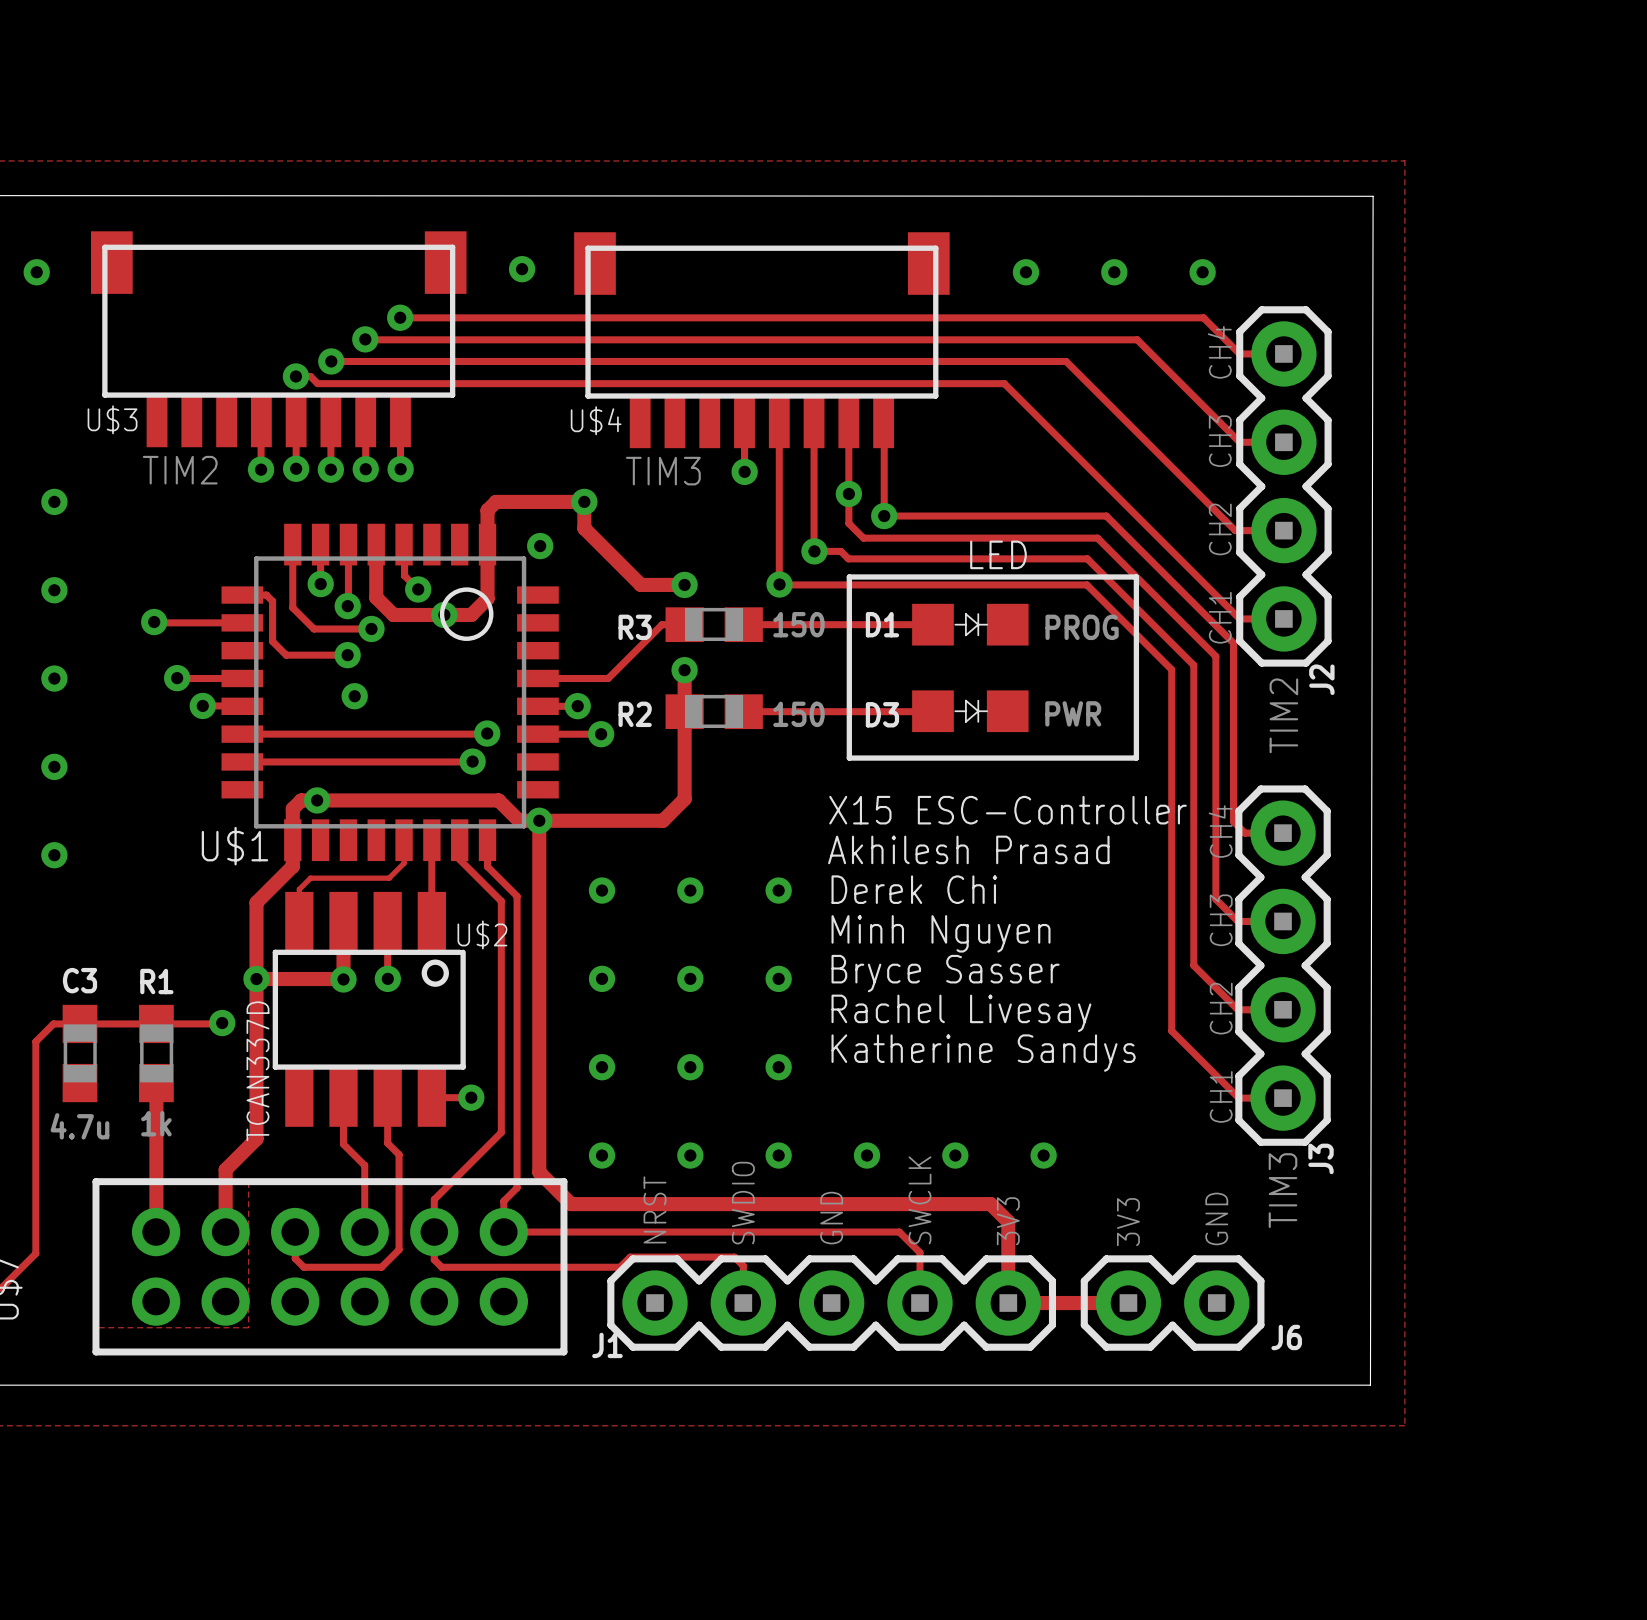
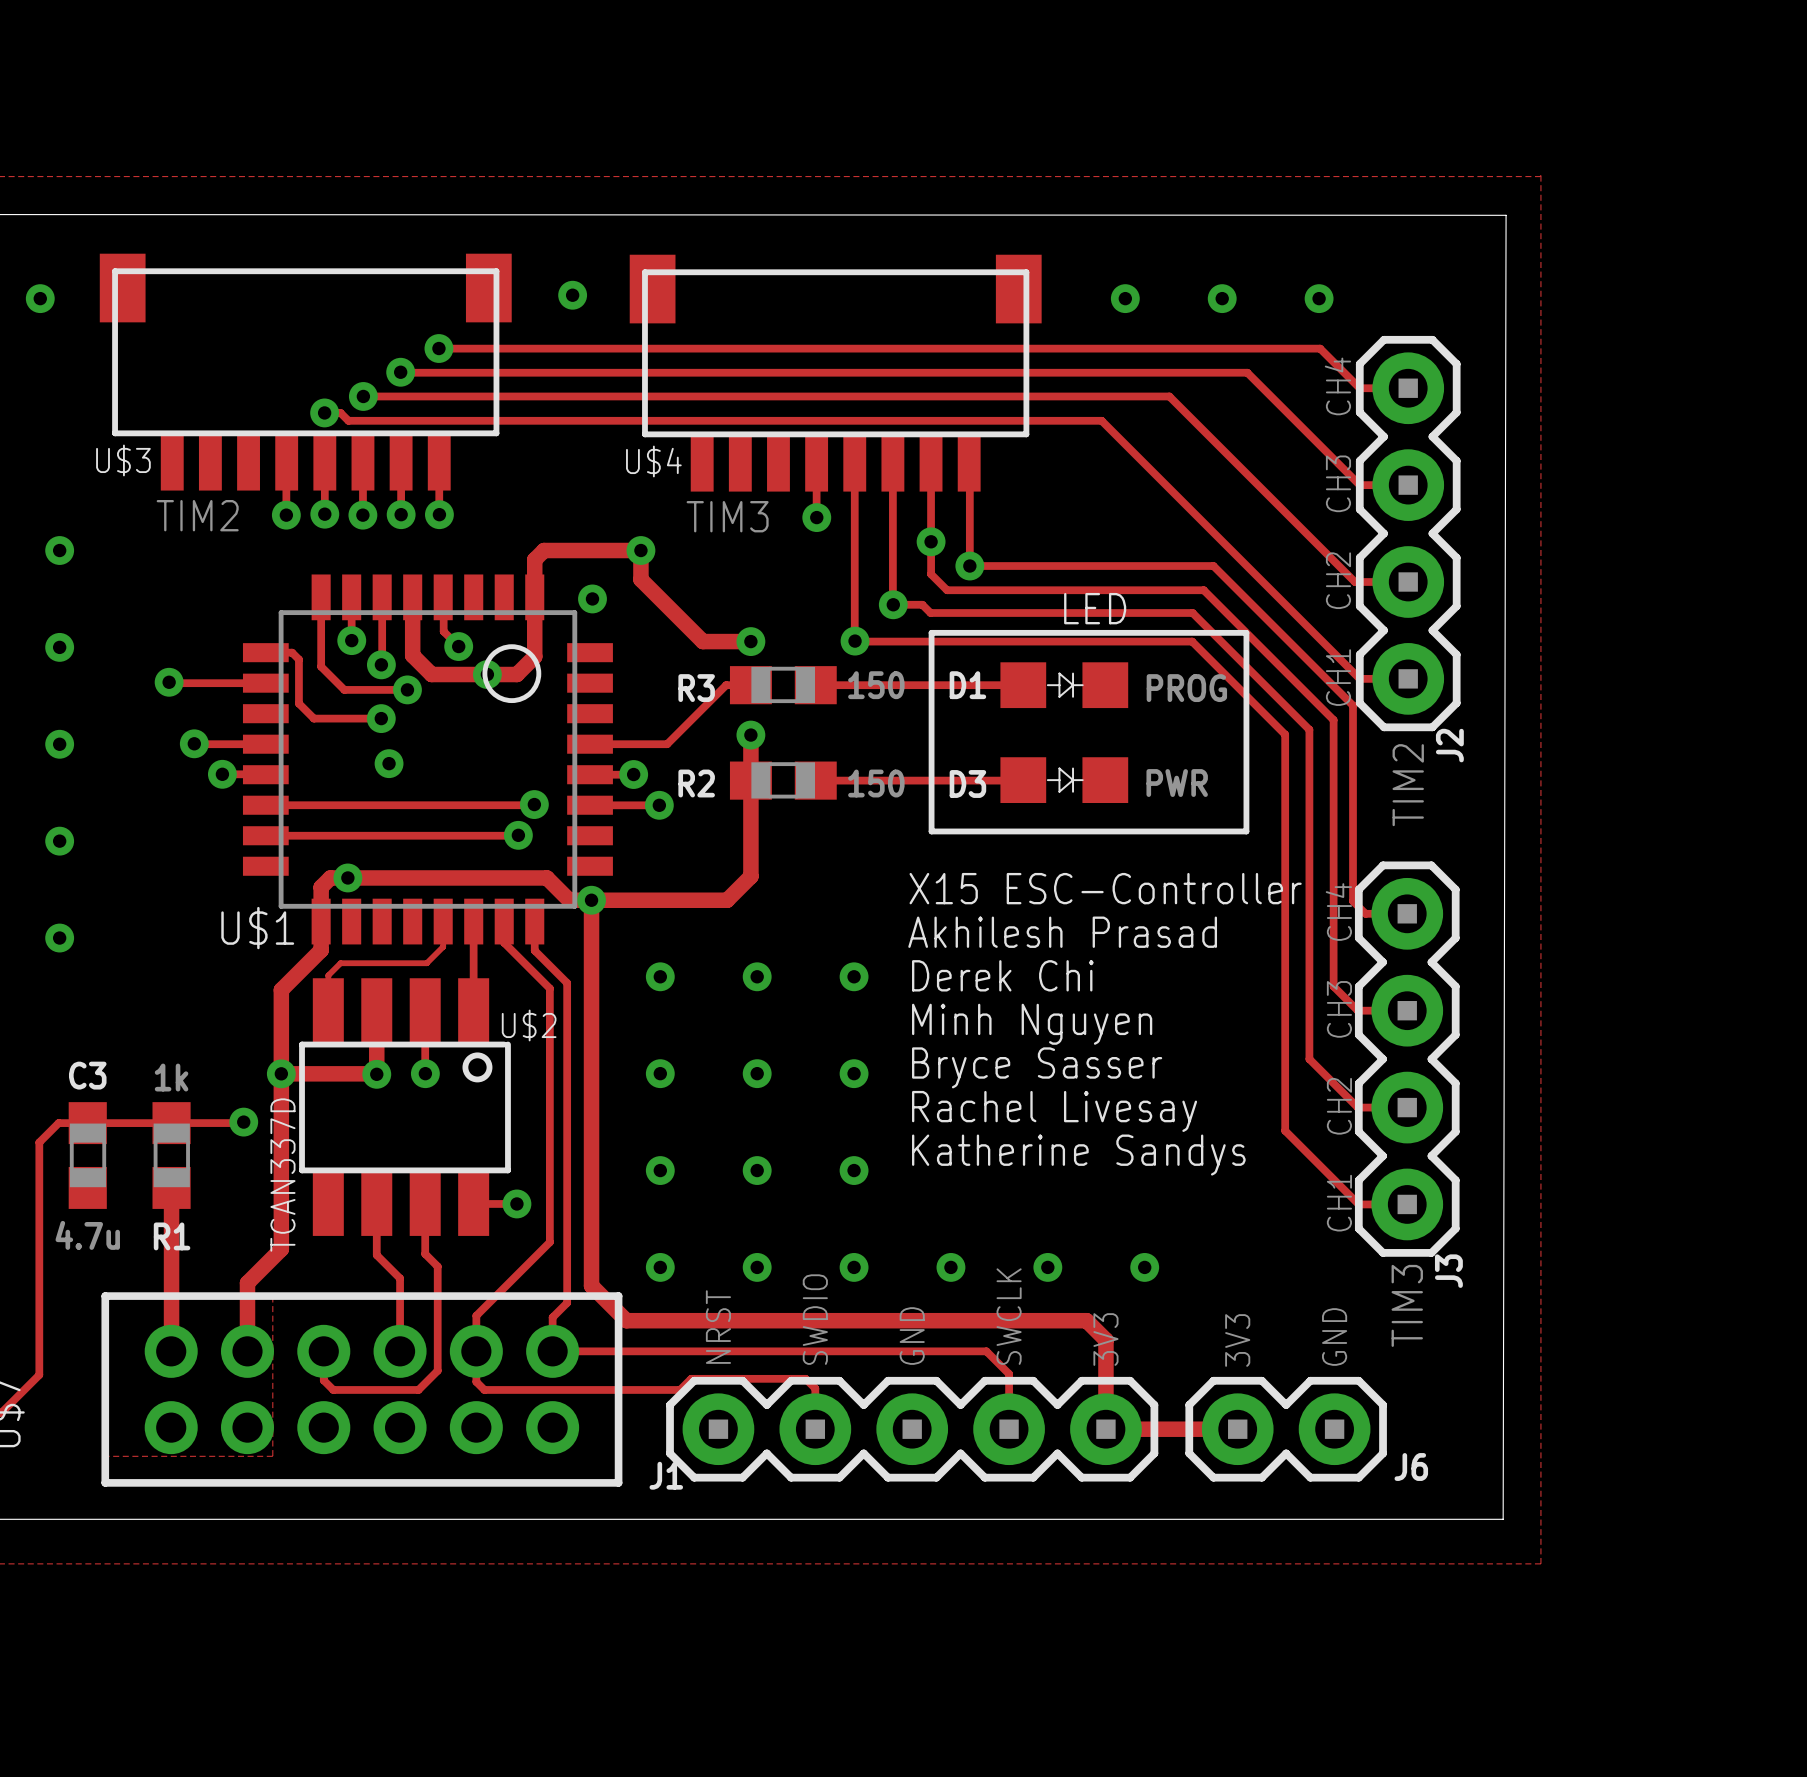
R1 name position: R1 (156, 981) -> R1 (172, 1236)
R1 value position: 1k (156, 1123) -> 1k (171, 1077)

